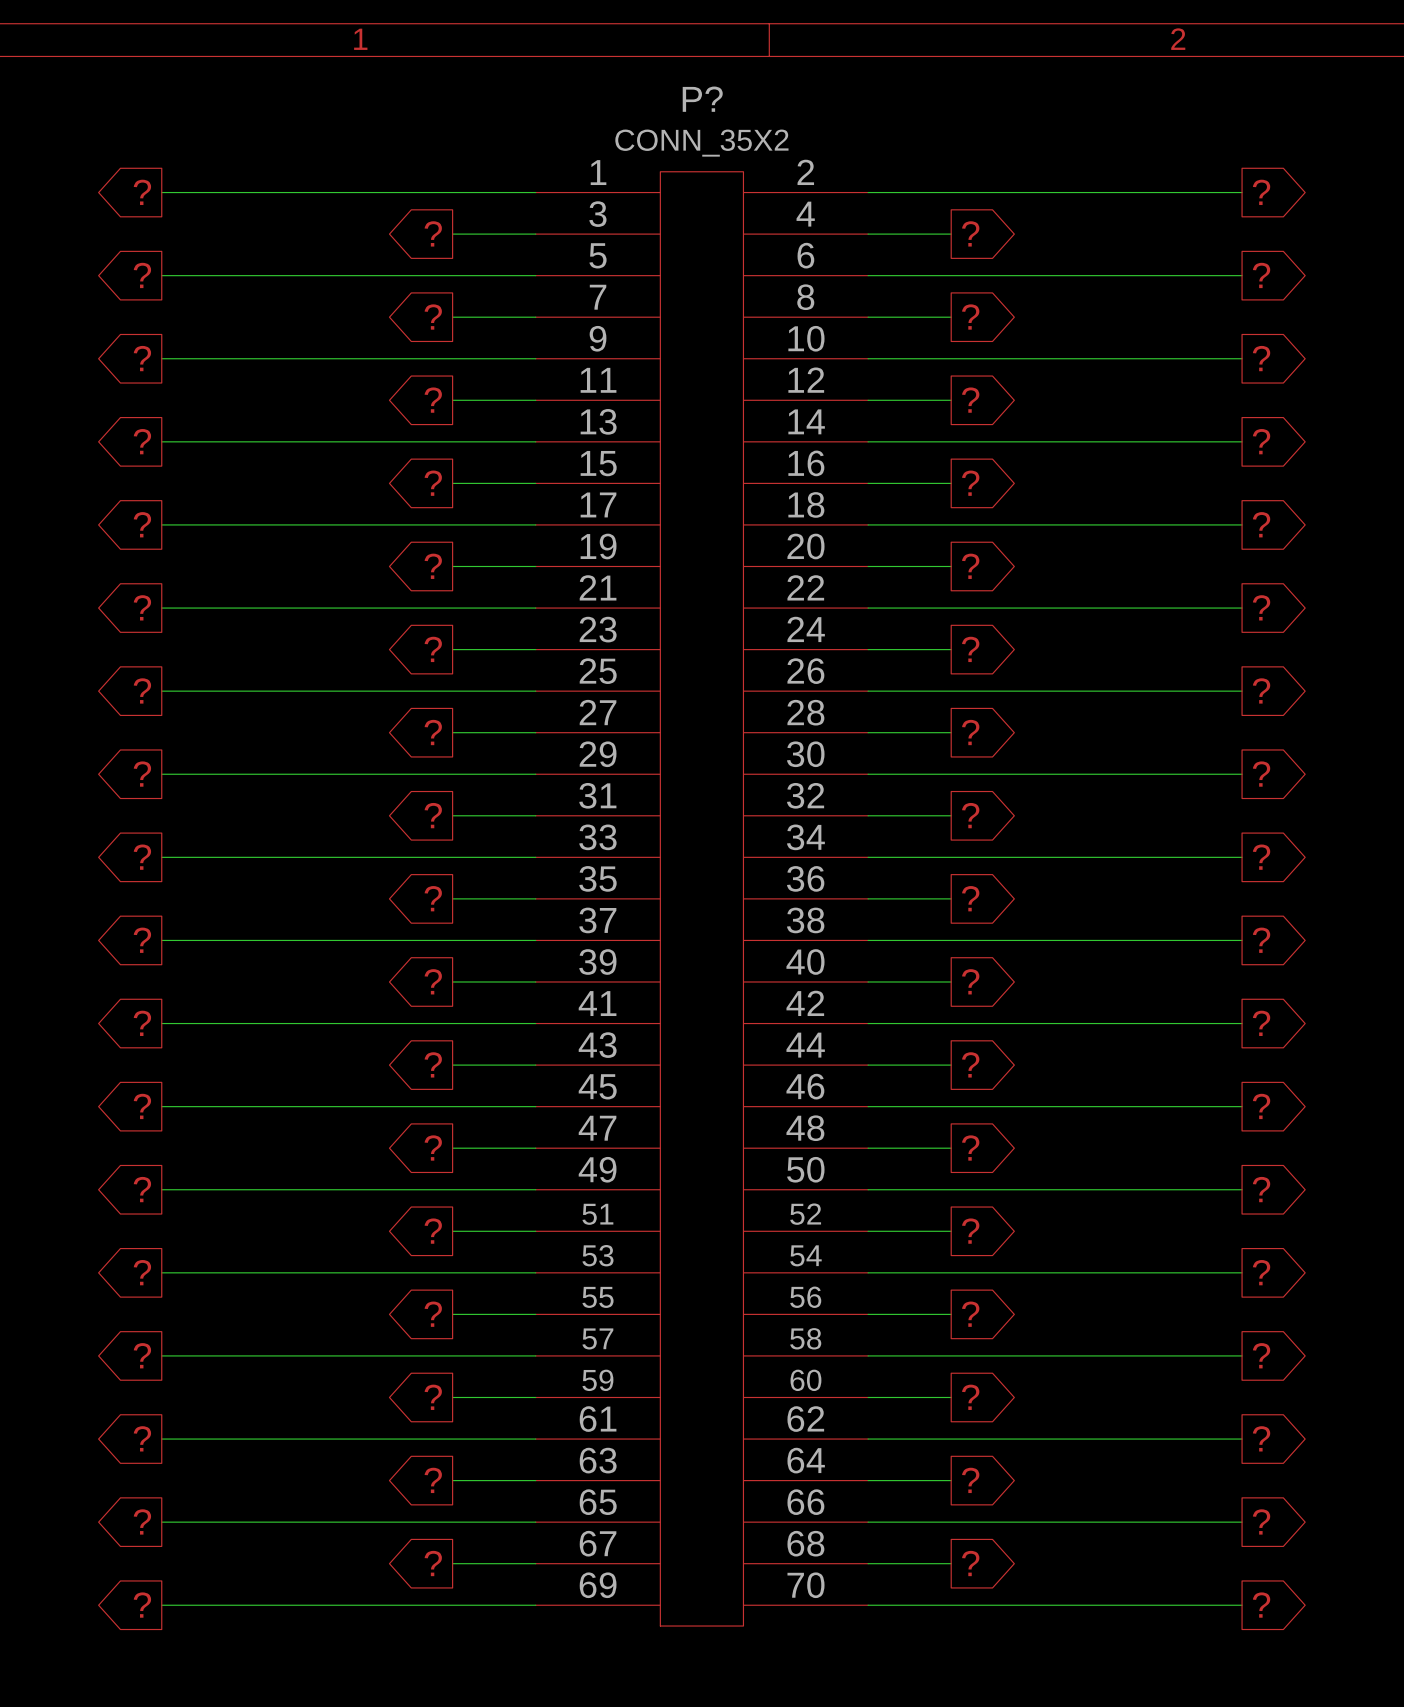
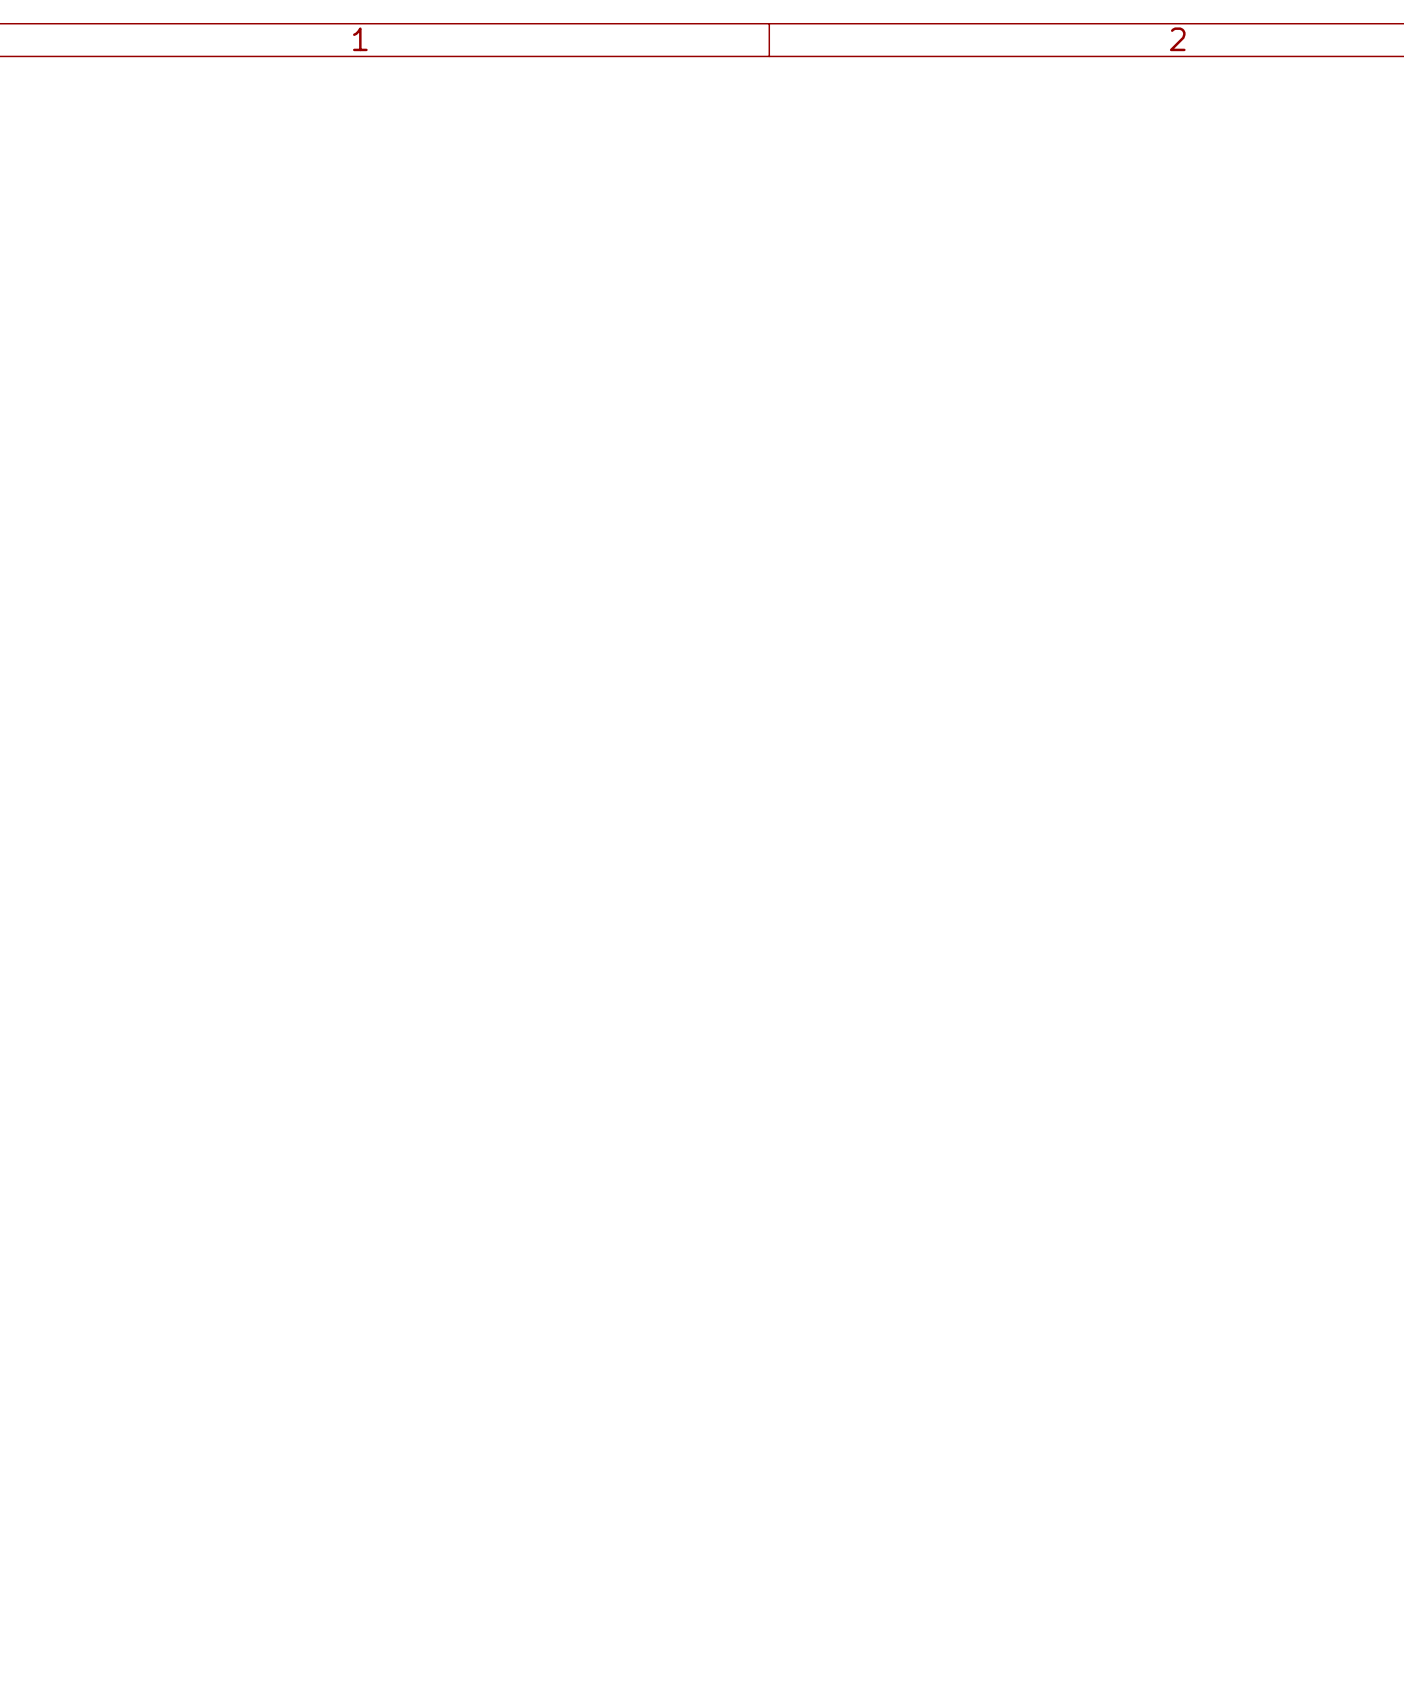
global label: ? (142, 192) -> none
wire: (161, 192) (535, 192) -> none
wire: (868, 192) (1242, 192) -> none
global label: ? (1261, 192) -> none
global label: ? (433, 233) -> none
global label: ? (970, 233) -> none
wire: (452, 234) (535, 234) -> none
wire: (868, 234) (951, 234) -> none
global label: ? (142, 275) -> none
wire: (161, 275) (535, 275) -> none
wire: (868, 275) (1242, 275) -> none
global label: ? (1261, 275) -> none
global label: ? (433, 317) -> none
wire: (452, 317) (535, 317) -> none
wire: (868, 317) (951, 317) -> none
global label: ? (970, 317) -> none
global label: ? (142, 358) -> none
wire: (161, 358) (535, 358) -> none
wire: (868, 358) (1242, 358) -> none
global label: ? (1261, 358) -> none
global label: ? (433, 400) -> none
wire: (452, 400) (535, 400) -> none
wire: (868, 400) (951, 400) -> none
global label: ? (970, 400) -> none
global label: ? (142, 441) -> none
wire: (161, 441) (535, 441) -> none
wire: (868, 441) (1242, 441) -> none
global label: ? (1261, 441) -> none
global label: ? (433, 483) -> none
wire: (452, 483) (535, 483) -> none
wire: (868, 483) (951, 483) -> none
global label: ? (970, 483) -> none
global label: ? (142, 524) -> none
wire: (161, 524) (535, 524) -> none
wire: (868, 524) (1242, 524) -> none
global label: ? (1261, 524) -> none
global label: ? (433, 566) -> none
wire: (452, 566) (535, 566) -> none
wire: (868, 566) (951, 566) -> none
global label: ? (970, 566) -> none
global label: ? (142, 607) -> none
global label: ? (1261, 607) -> none
wire: (161, 608) (535, 608) -> none
wire: (868, 608) (1242, 608) -> none
global label: ? (433, 649) -> none
wire: (452, 649) (535, 649) -> none
wire: (868, 649) (951, 649) -> none
global label: ? (970, 649) -> none
global label: ? (142, 690) -> none
global label: ? (1261, 690) -> none
wire: (161, 691) (535, 691) -> none
wire: (868, 691) (1242, 691) -> none
global label: ? (433, 732) -> none
wire: (452, 732) (535, 732) -> none
wire: (868, 732) (951, 732) -> none
global label: ? (970, 732) -> none
global label: ? (142, 774) -> none
wire: (161, 774) (535, 774) -> none
wire: (868, 774) (1242, 774) -> none
global label: ? (1261, 774) -> none
global label: ? (433, 815) -> none
wire: (452, 815) (535, 815) -> none
wire: (868, 815) (951, 815) -> none
global label: ? (970, 815) -> none
global label: ? (142, 857) -> none
wire: (161, 857) (535, 857) -> none
wire: (868, 857) (1242, 857) -> none
global label: ? (1261, 857) -> none
global label: ? (433, 898) -> none
wire: (452, 898) (535, 898) -> none
P?: CONN_35X2 (701, 898) -> none
wire: (868, 898) (951, 898) -> none
global label: ? (970, 898) -> none
global label: ? (142, 940) -> none
wire: (161, 940) (535, 940) -> none
wire: (868, 940) (1242, 940) -> none
global label: ? (1261, 940) -> none
global label: ? (433, 981) -> none
wire: (452, 981) (535, 981) -> none
wire: (868, 981) (951, 981) -> none
global label: ? (970, 981) -> none
global label: ? (142, 1023) -> none
wire: (161, 1023) (535, 1023) -> none
wire: (868, 1023) (1242, 1023) -> none
global label: ? (1261, 1023) -> none
global label: ? (433, 1064) -> none
global label: ? (970, 1064) -> none
wire: (452, 1065) (535, 1065) -> none
wire: (868, 1065) (951, 1065) -> none
global label: ? (142, 1106) -> none
wire: (161, 1106) (535, 1106) -> none
wire: (868, 1106) (1242, 1106) -> none
global label: ? (1261, 1106) -> none
global label: ? (433, 1148) -> none
wire: (452, 1148) (535, 1148) -> none
wire: (868, 1148) (951, 1148) -> none
global label: ? (970, 1148) -> none
global label: ? (142, 1189) -> none
wire: (161, 1189) (535, 1189) -> none
wire: (868, 1189) (1242, 1189) -> none
global label: ? (1261, 1189) -> none
global label: ? (433, 1231) -> none
wire: (452, 1231) (535, 1231) -> none
wire: (868, 1231) (951, 1231) -> none
global label: ? (970, 1231) -> none
global label: ? (142, 1272) -> none
wire: (161, 1272) (535, 1272) -> none
wire: (868, 1272) (1242, 1272) -> none
global label: ? (1261, 1272) -> none
global label: ? (433, 1314) -> none
wire: (452, 1314) (535, 1314) -> none
wire: (868, 1314) (951, 1314) -> none
global label: ? (970, 1314) -> none
global label: ? (142, 1355) -> none
wire: (161, 1355) (535, 1355) -> none
wire: (868, 1355) (1242, 1355) -> none
global label: ? (1261, 1355) -> none
global label: ? (433, 1397) -> none
wire: (452, 1397) (535, 1397) -> none
wire: (868, 1397) (951, 1397) -> none
global label: ? (970, 1397) -> none
global label: ? (142, 1438) -> none
global label: ? (1261, 1438) -> none
wire: (161, 1439) (535, 1439) -> none
wire: (868, 1439) (1242, 1439) -> none
global label: ? (433, 1480) -> none
wire: (452, 1480) (535, 1480) -> none
wire: (868, 1480) (951, 1480) -> none
global label: ? (970, 1480) -> none
global label: ? (142, 1521) -> none
global label: ? (1261, 1521) -> none
wire: (161, 1522) (535, 1522) -> none
wire: (868, 1522) (1242, 1522) -> none
global label: ? (433, 1563) -> none
wire: (452, 1563) (535, 1563) -> none
wire: (868, 1563) (951, 1563) -> none
global label: ? (970, 1563) -> none
global label: ? (142, 1605) -> none
wire: (161, 1605) (535, 1605) -> none
wire: (868, 1605) (1242, 1605) -> none
global label: ? (1261, 1605) -> none

